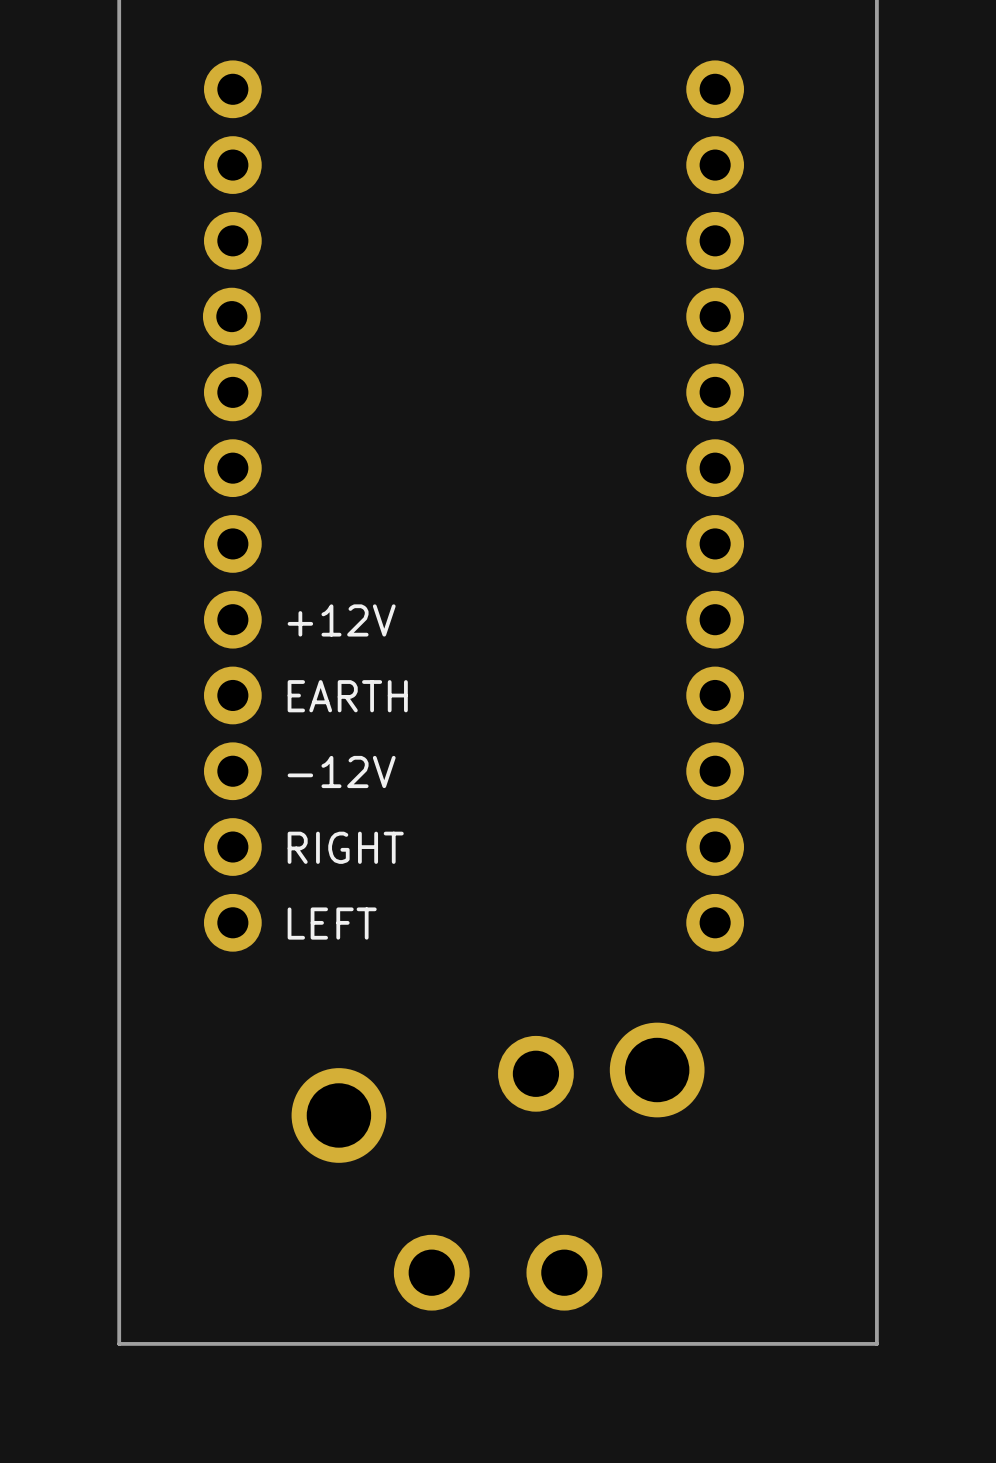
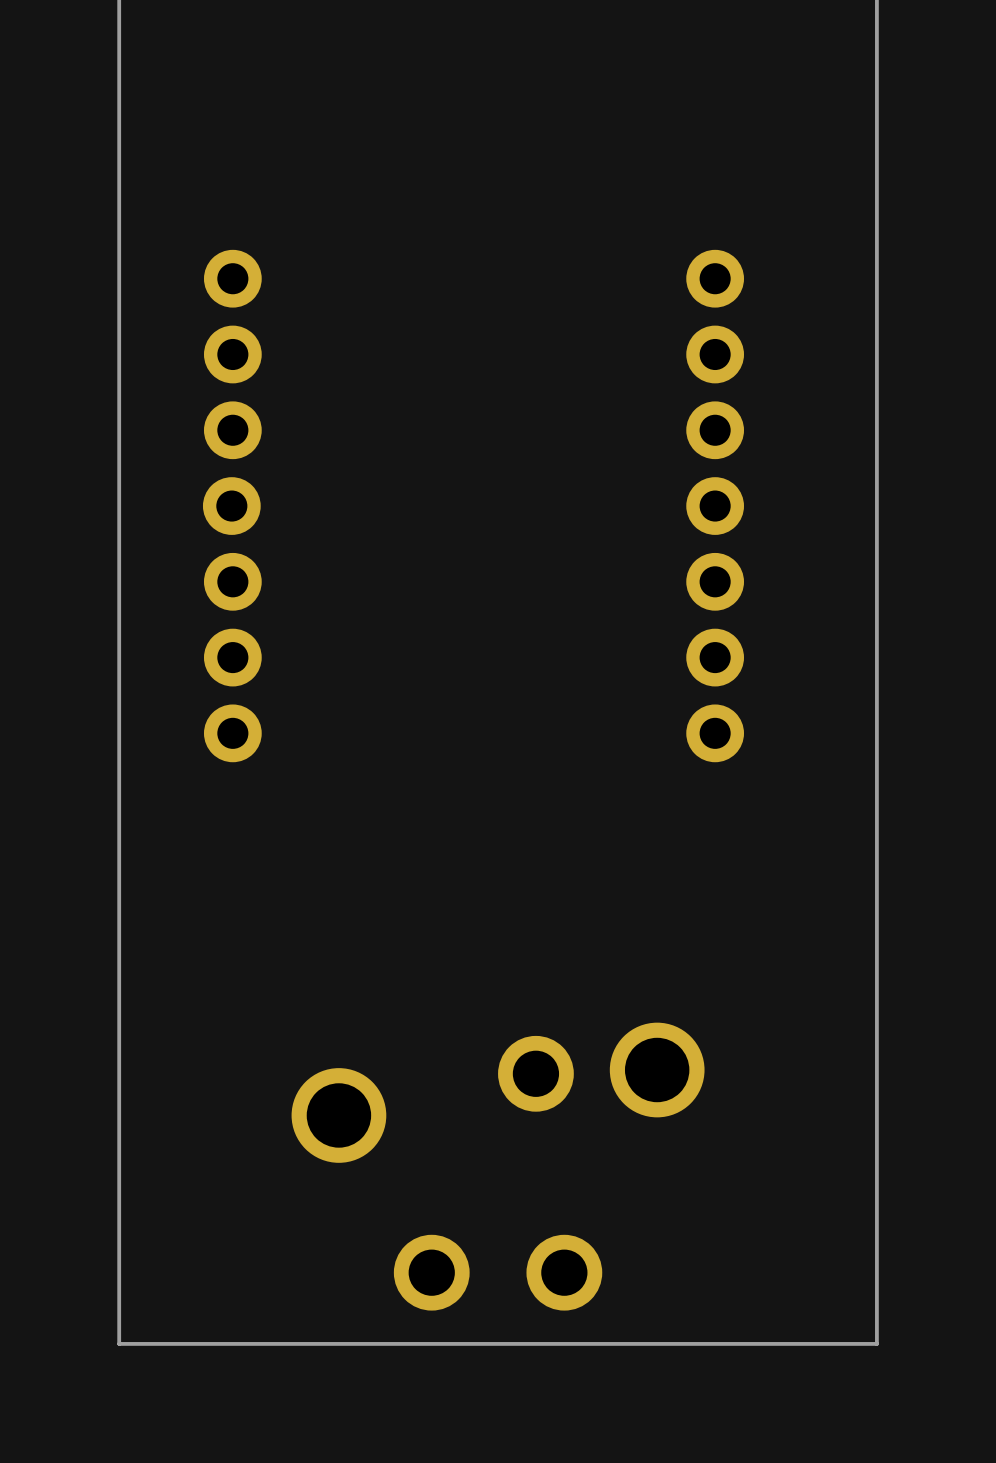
part footprint: [202, 60, 262, 952] -> [202, 249, 262, 763]
part footprint: [686, 60, 745, 952] -> [686, 249, 745, 763]
text: +12V (341, 620) -> none
text: EARTH (347, 696) -> none
text: -12V (341, 772) -> none
text: RIGHT (345, 847) -> none
text: LEFT (332, 923) -> none

